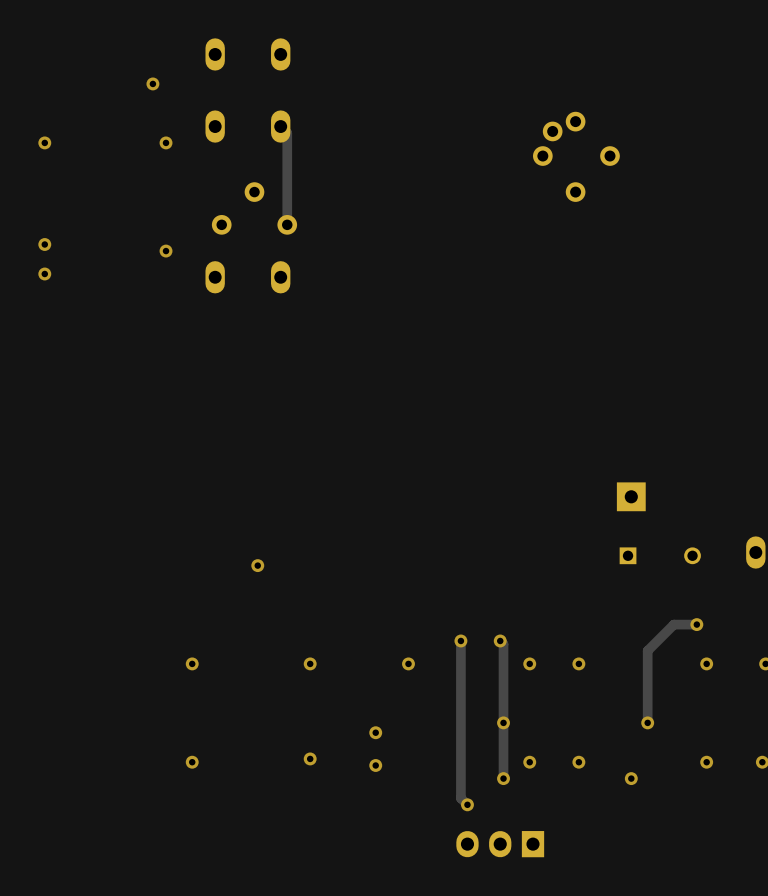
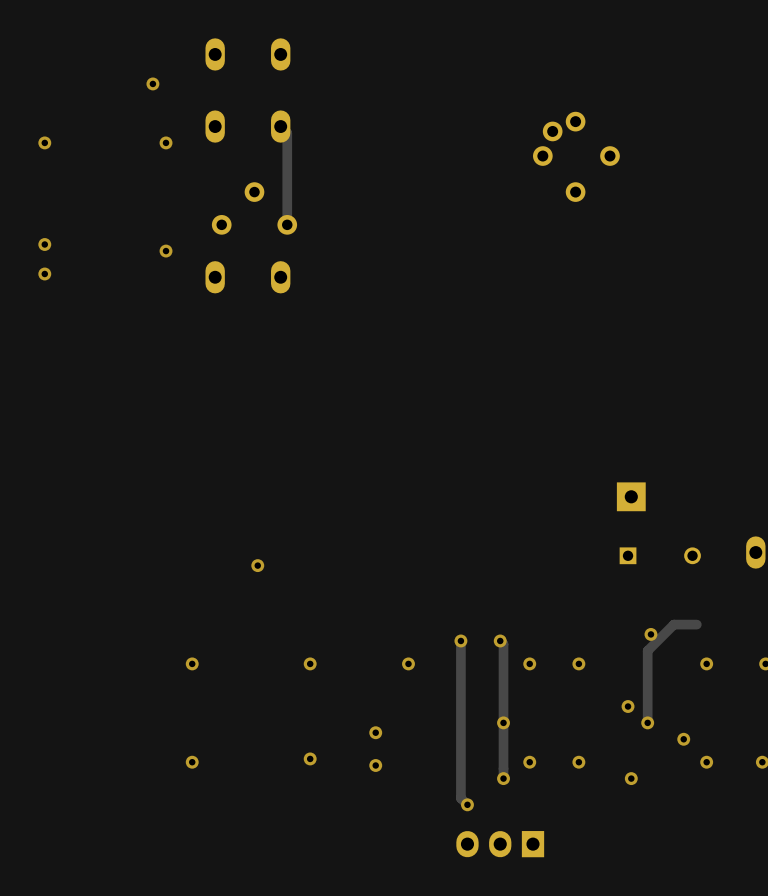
via position: (696, 624) -> (650, 634)
via: none -> (628, 706)
via: none -> (683, 739)

